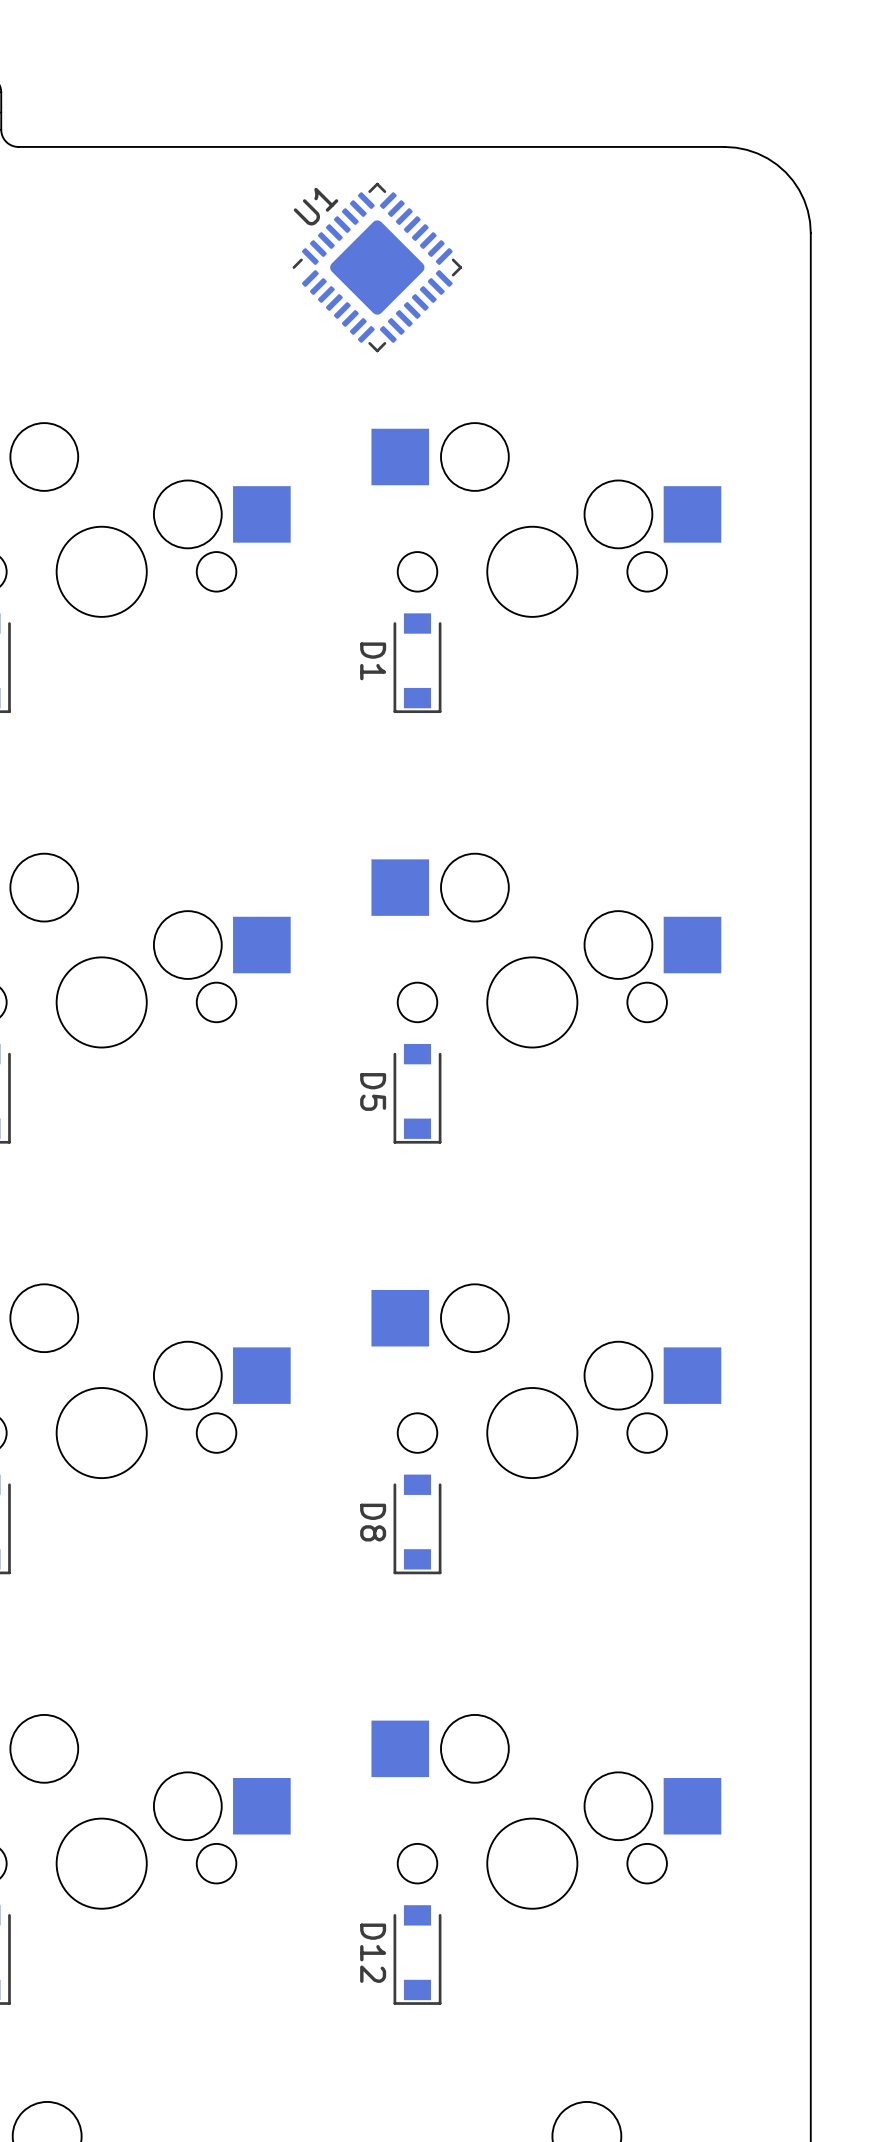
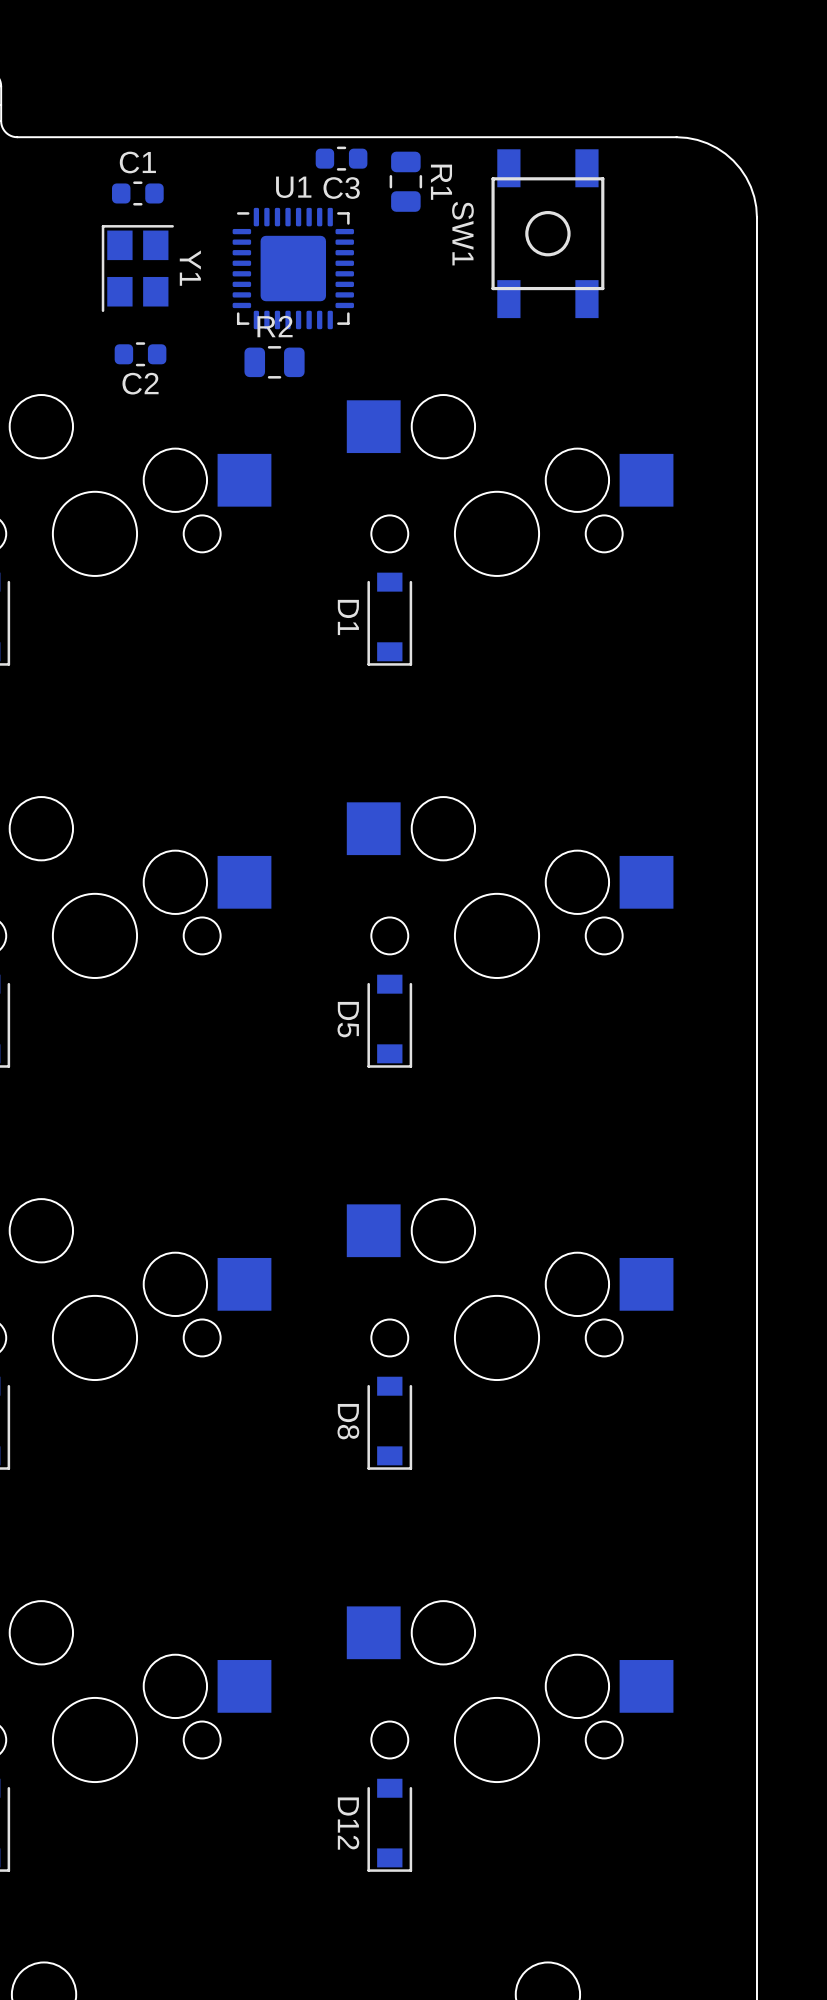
C3: none -> (341, 158)
R1: none -> (405, 181)
C1: none -> (137, 193)
SW1: none -> (547, 233)
U1 rotation: 0° (377, 267) -> 45° clockwise (293, 268)
Y1: none -> (137, 268)
C2: none -> (140, 354)
R2: none -> (274, 362)

